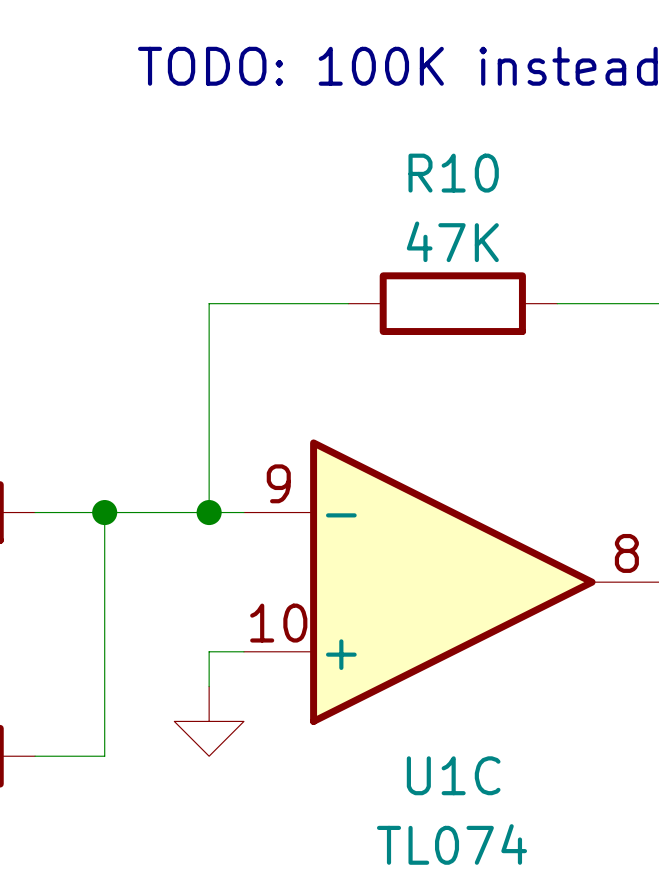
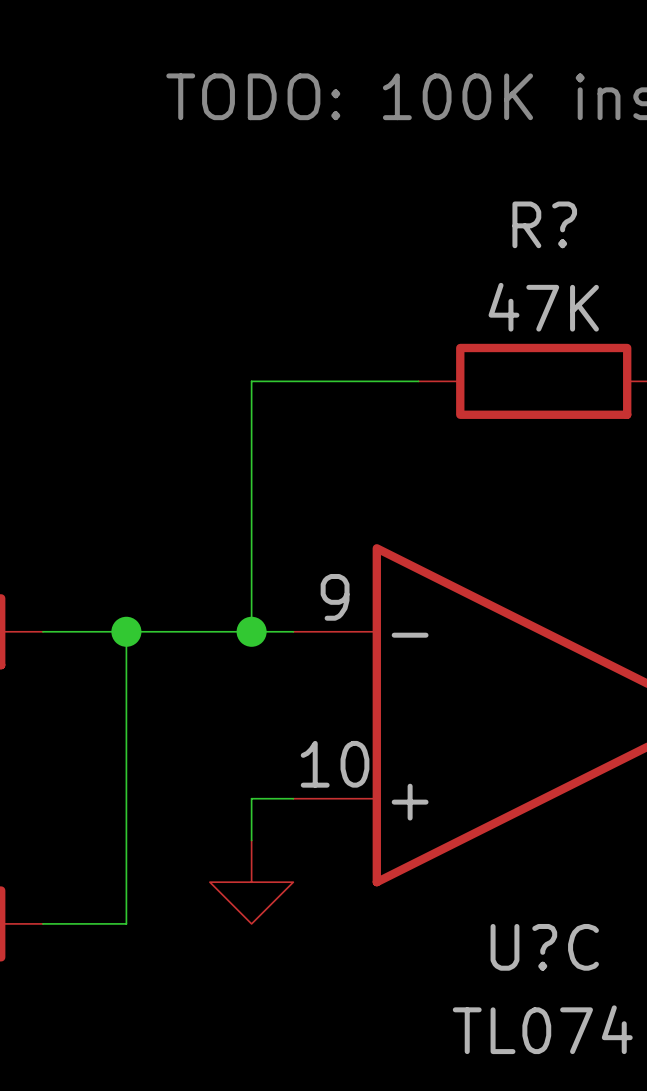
R10 name: R10 (453, 173) -> R? (544, 224)
U1C name: U1C (453, 775) -> U?C (544, 947)

